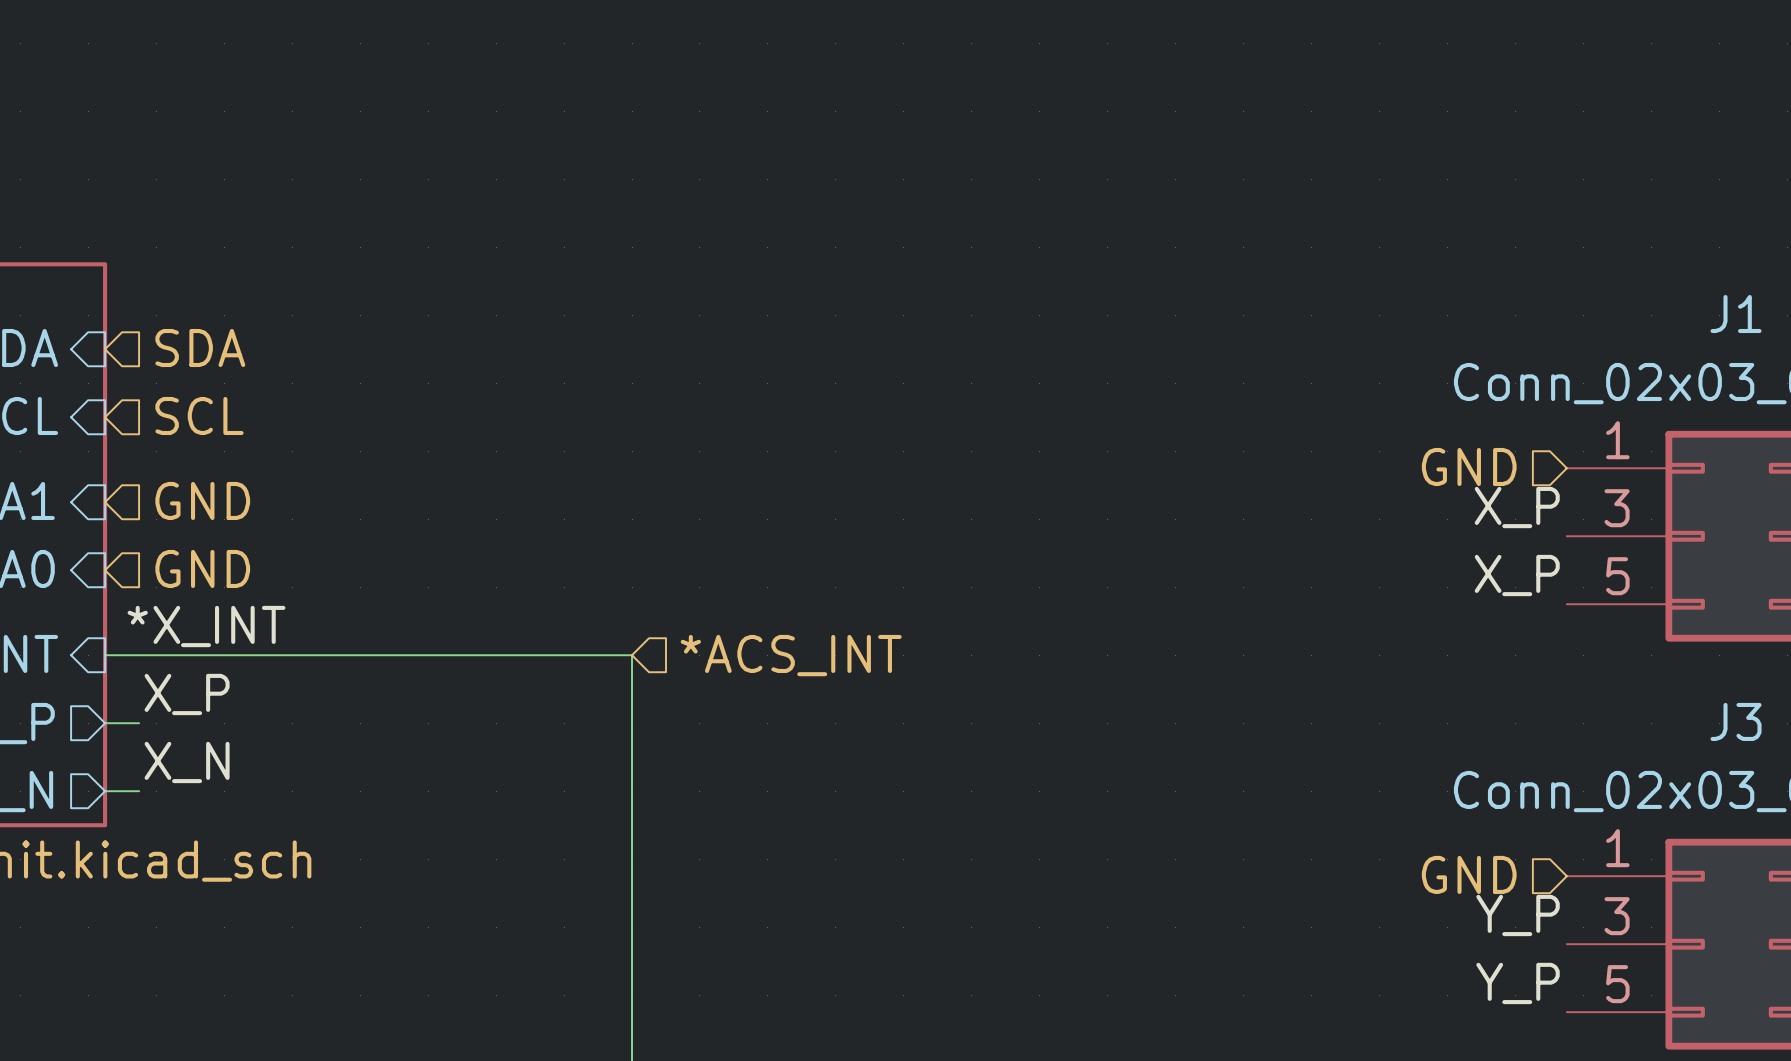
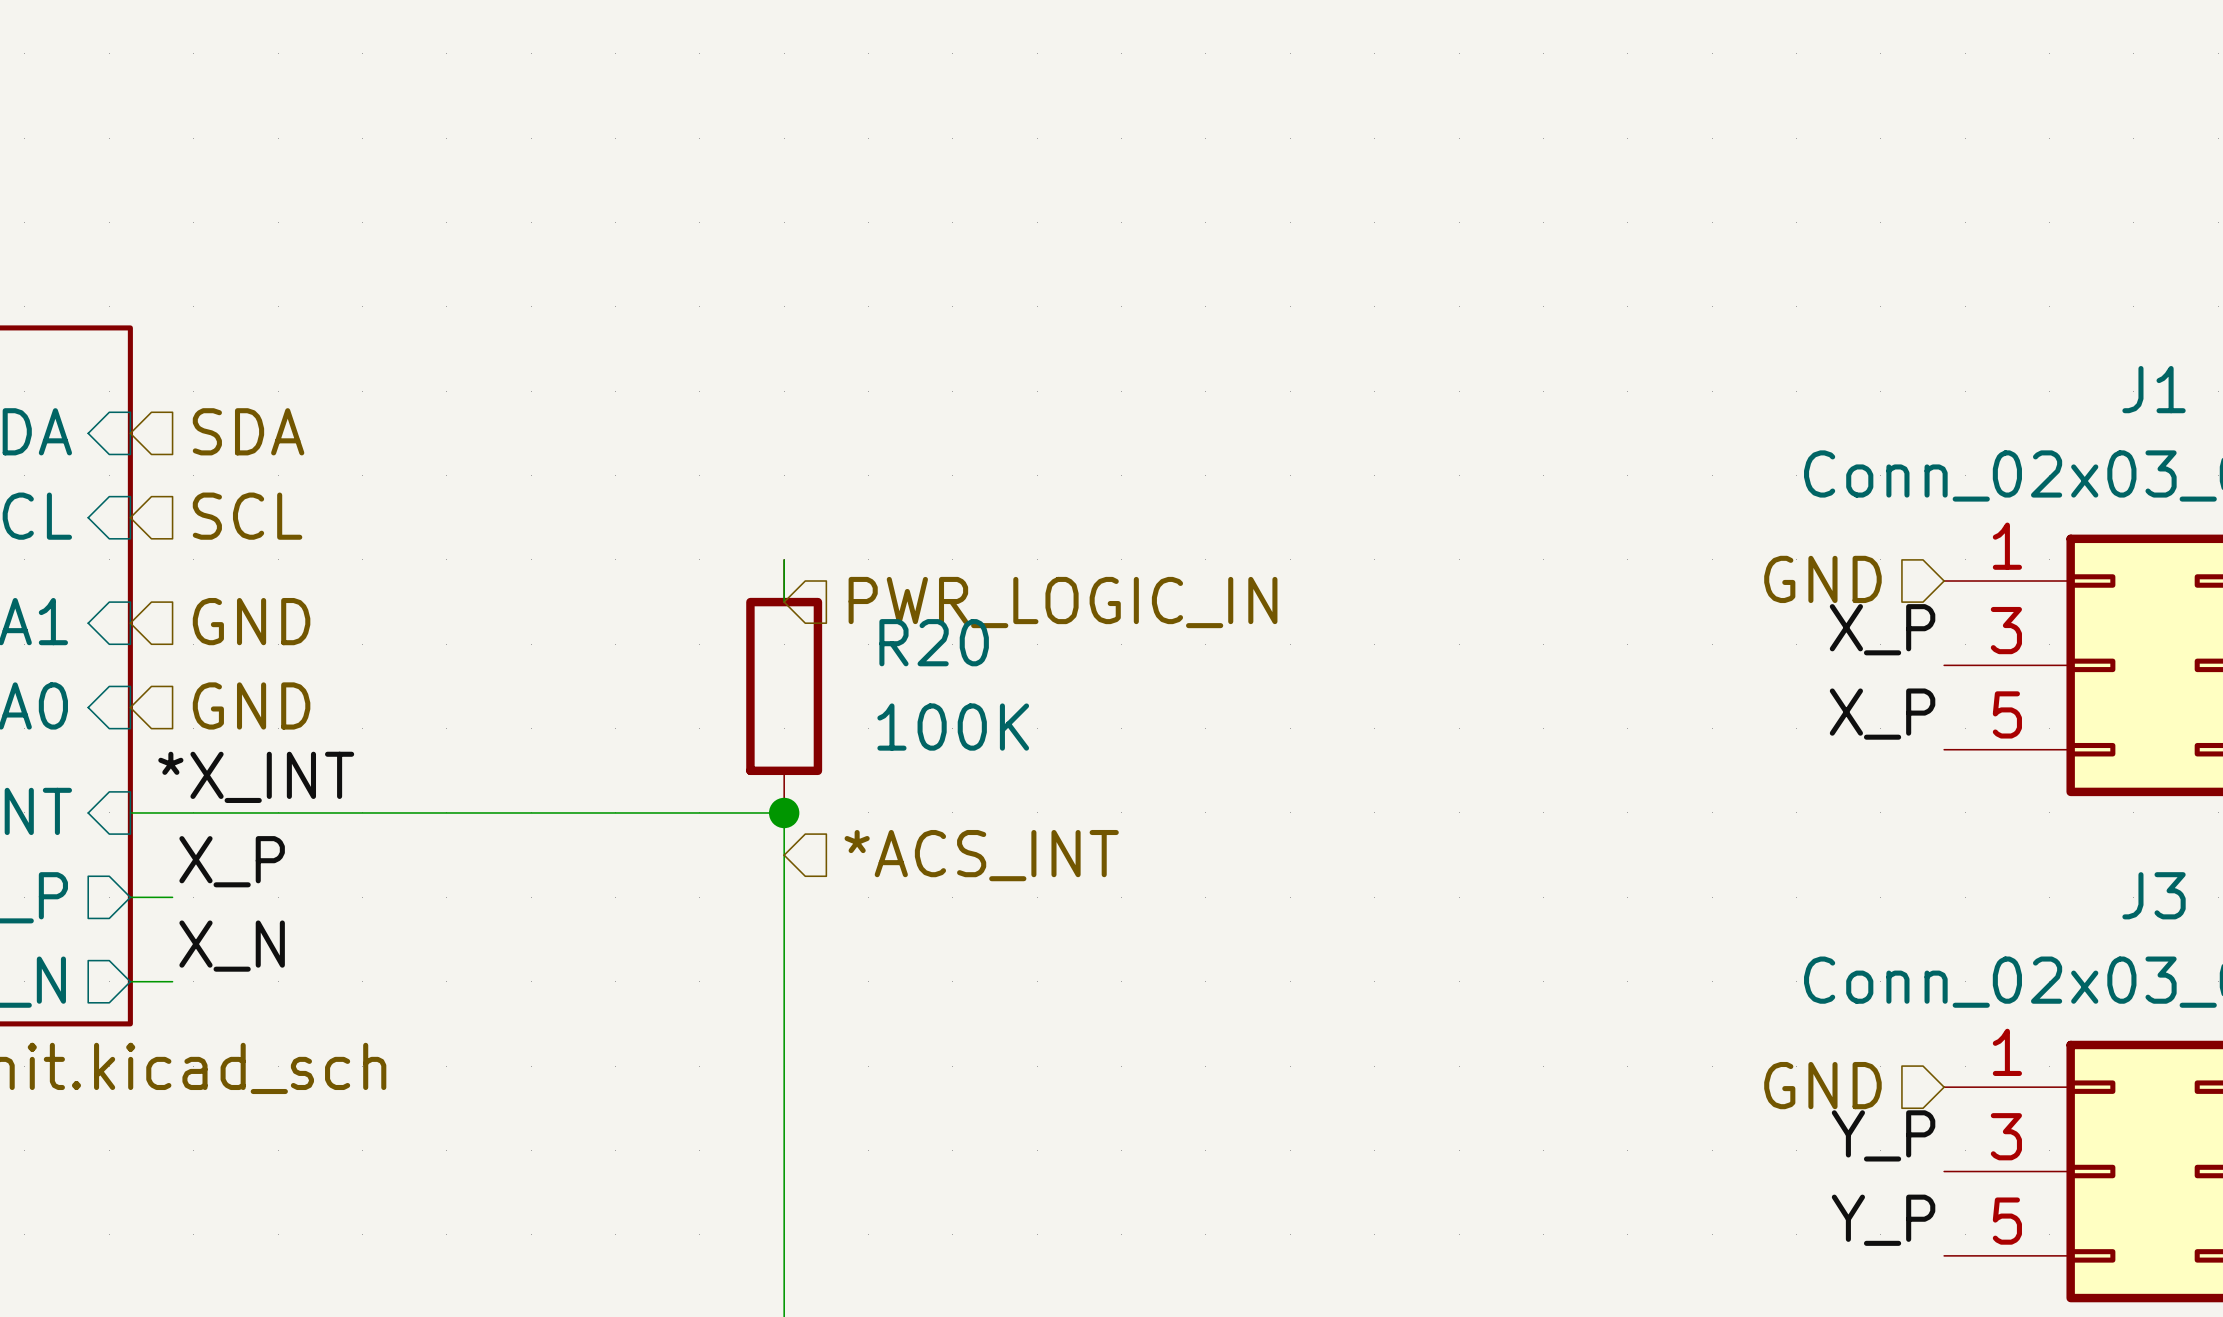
wire: none -> (784, 559) (784, 602)
hierarchical label: none -> PWR_LOGIC_IN (1063, 602)
R20: none -> 100K (784, 686)
junction: none -> (784, 812)
hierarchical label position: *ACS_INT (791, 655) -> *ACS_INT (981, 855)

